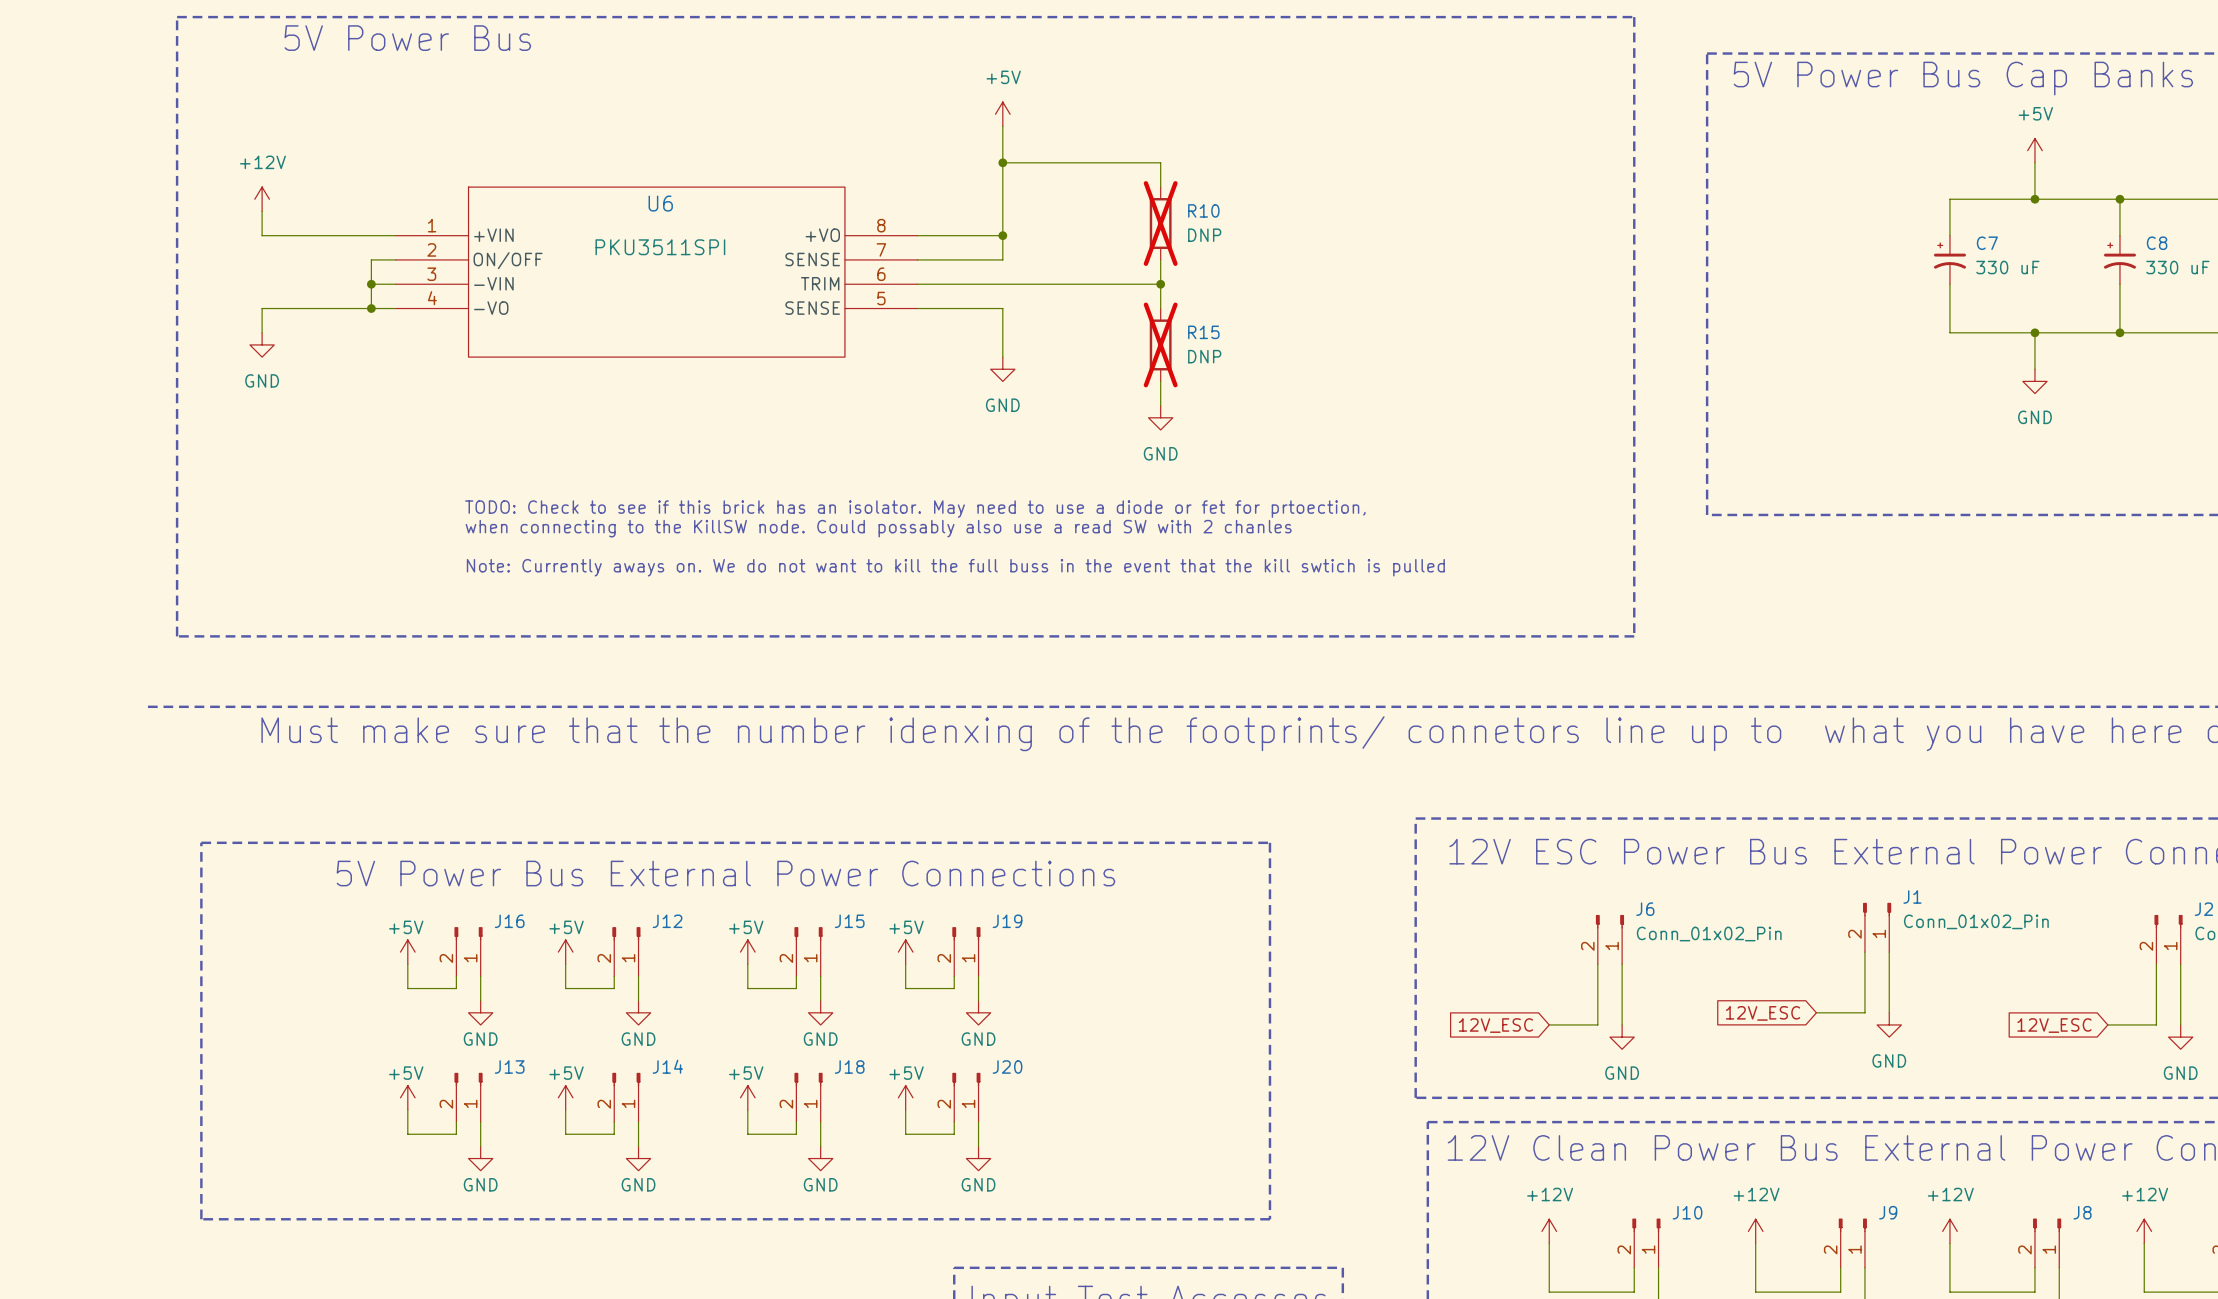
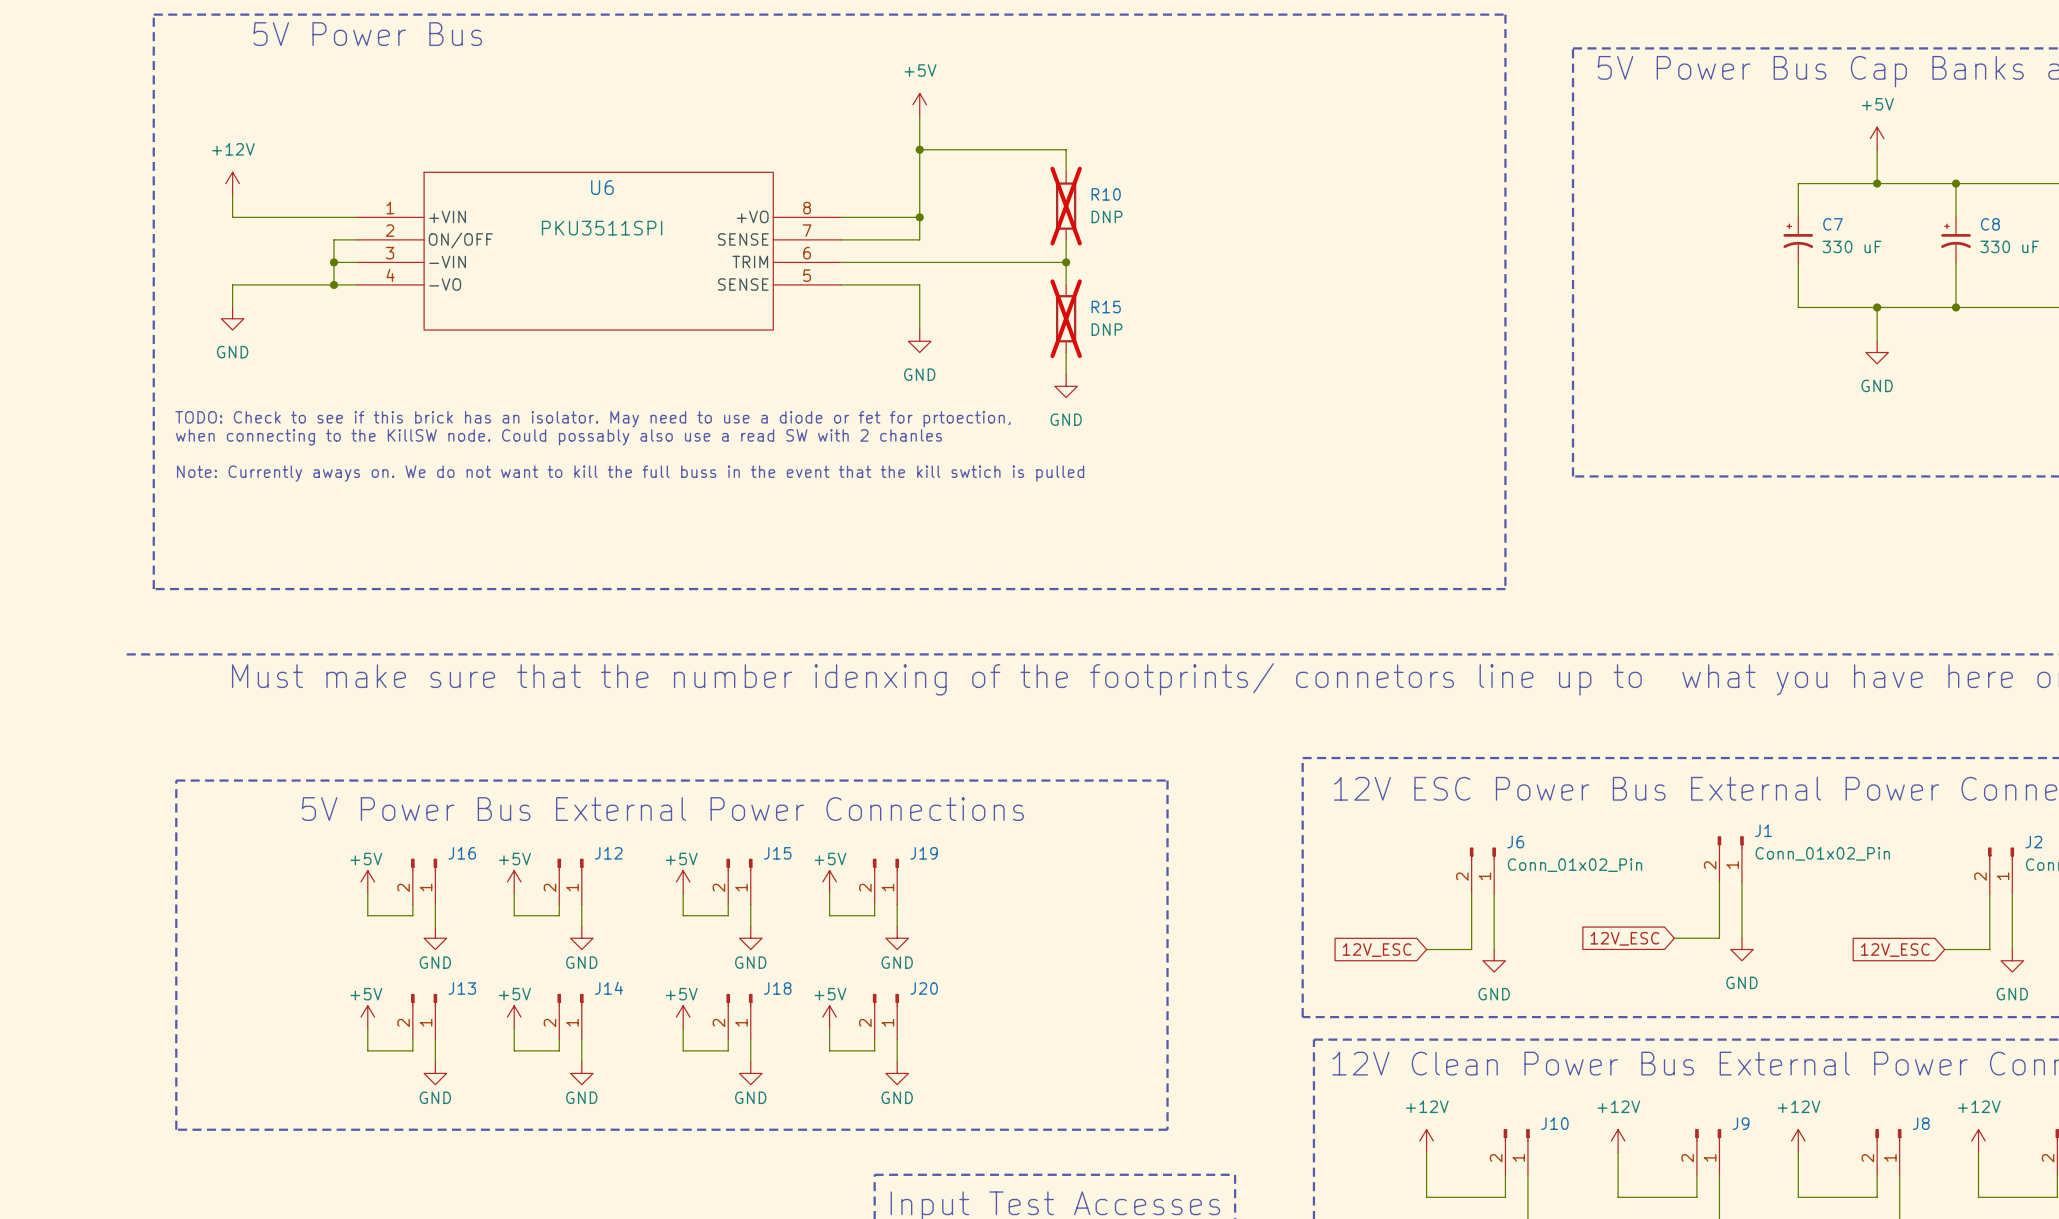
text: none -> TODO: Check to see if this brick has an isolator. May need to use a diode or fet for prtoection, (593, 419)
text: none -> when connecting to the KillSW node. Could possably also use a read SW with 2 chanles (558, 437)
text: TODO: Check to see if this brick has an isolator. May need to use a diode or fet for prtoection, (915, 509) -> none
text: none -> Note: Currently aways on. We do not want to kill the full buss in the event that the kill swtich is pulled (630, 473)
text: when connecting to the KillSW node. Could possably also use a read SW with 2 chanles (878, 528) -> none
text: Note: Currently aways on. We do not want to kill the full buss in the event that the kill swtich is pulled (955, 567) -> none

